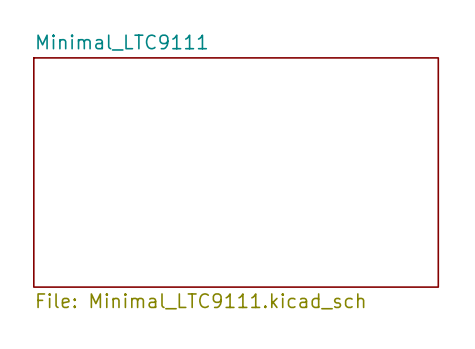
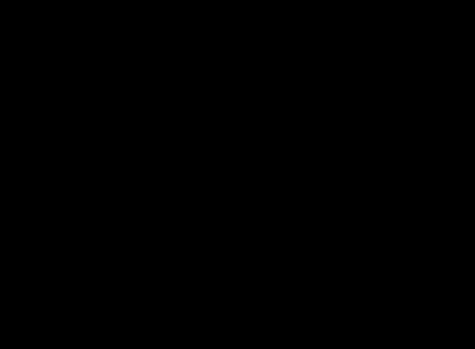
sheet Minimal_LTC9111: File: Minimal_LTC9111.kicad_sch (236, 172) -> none

